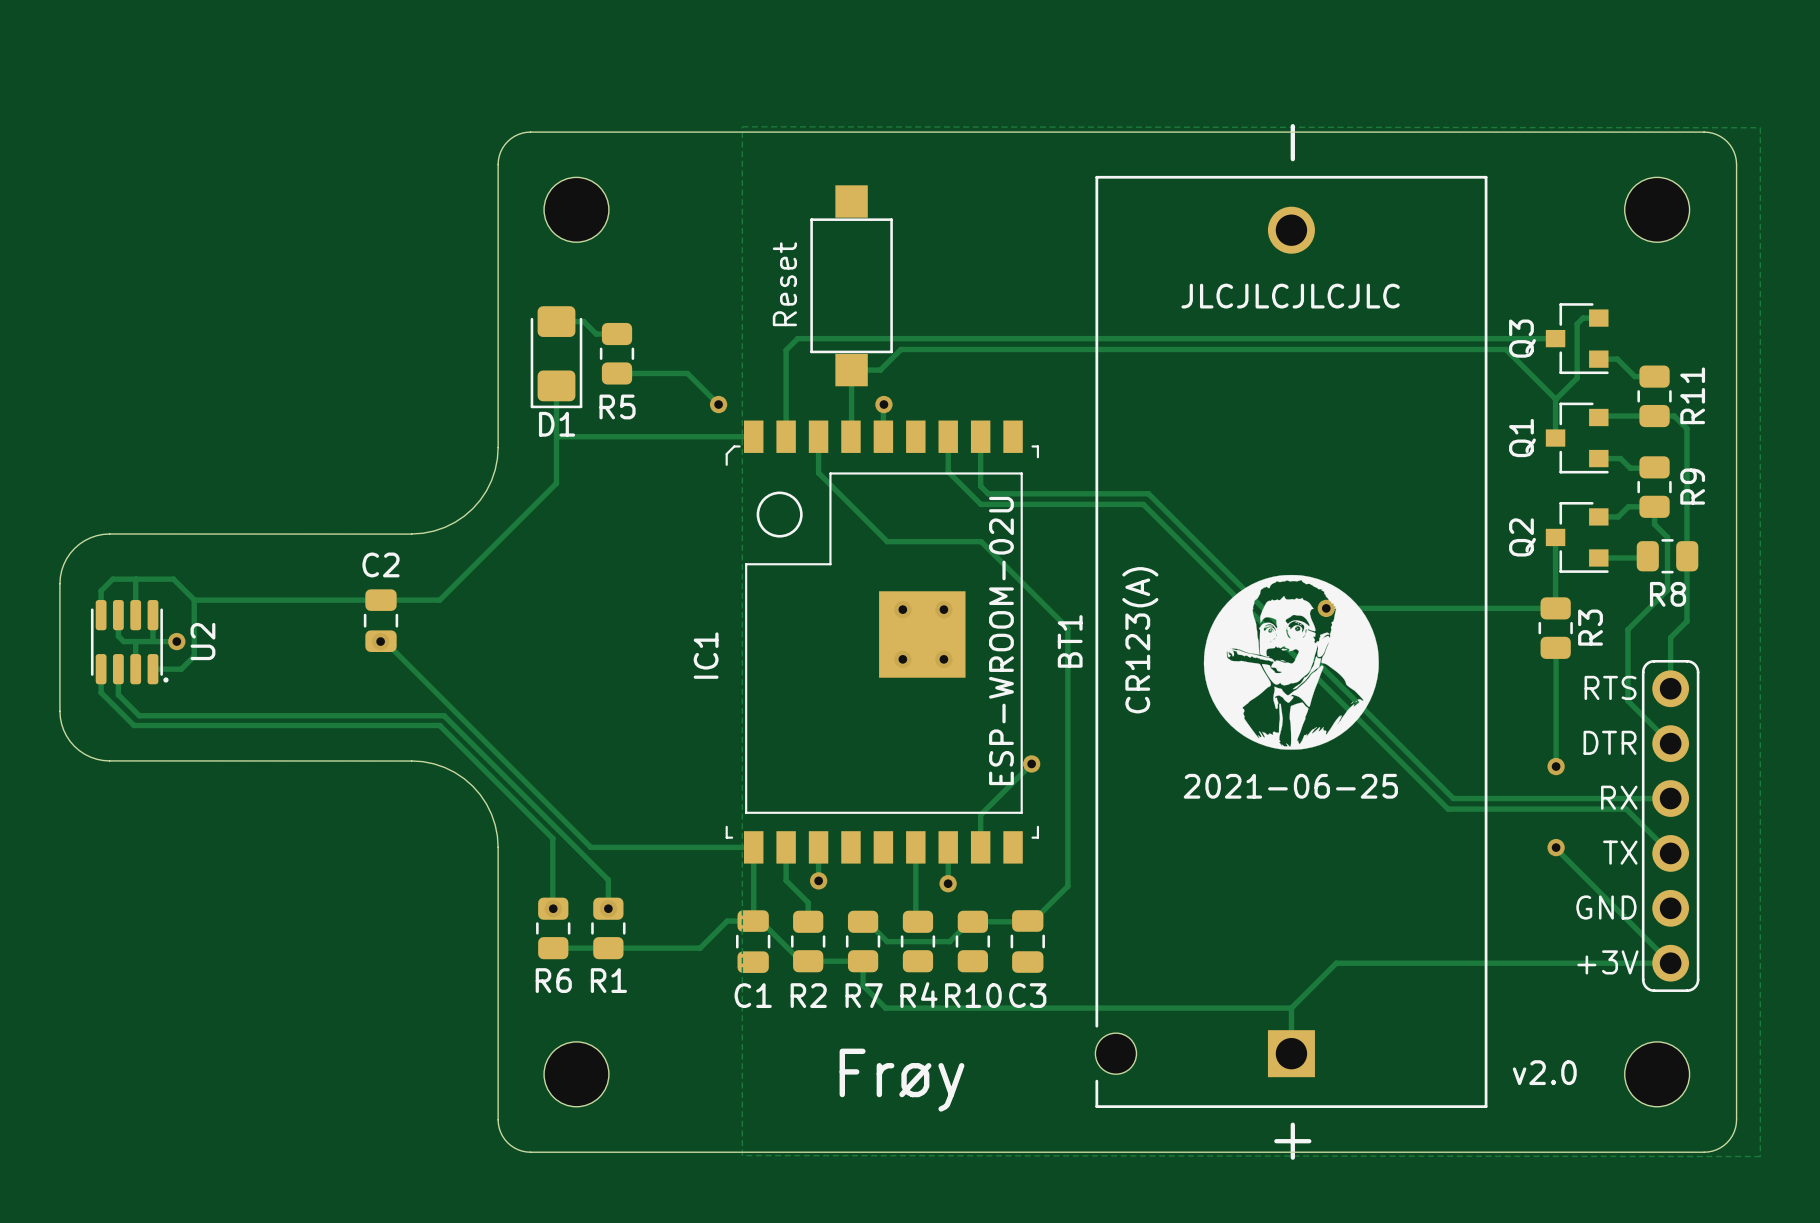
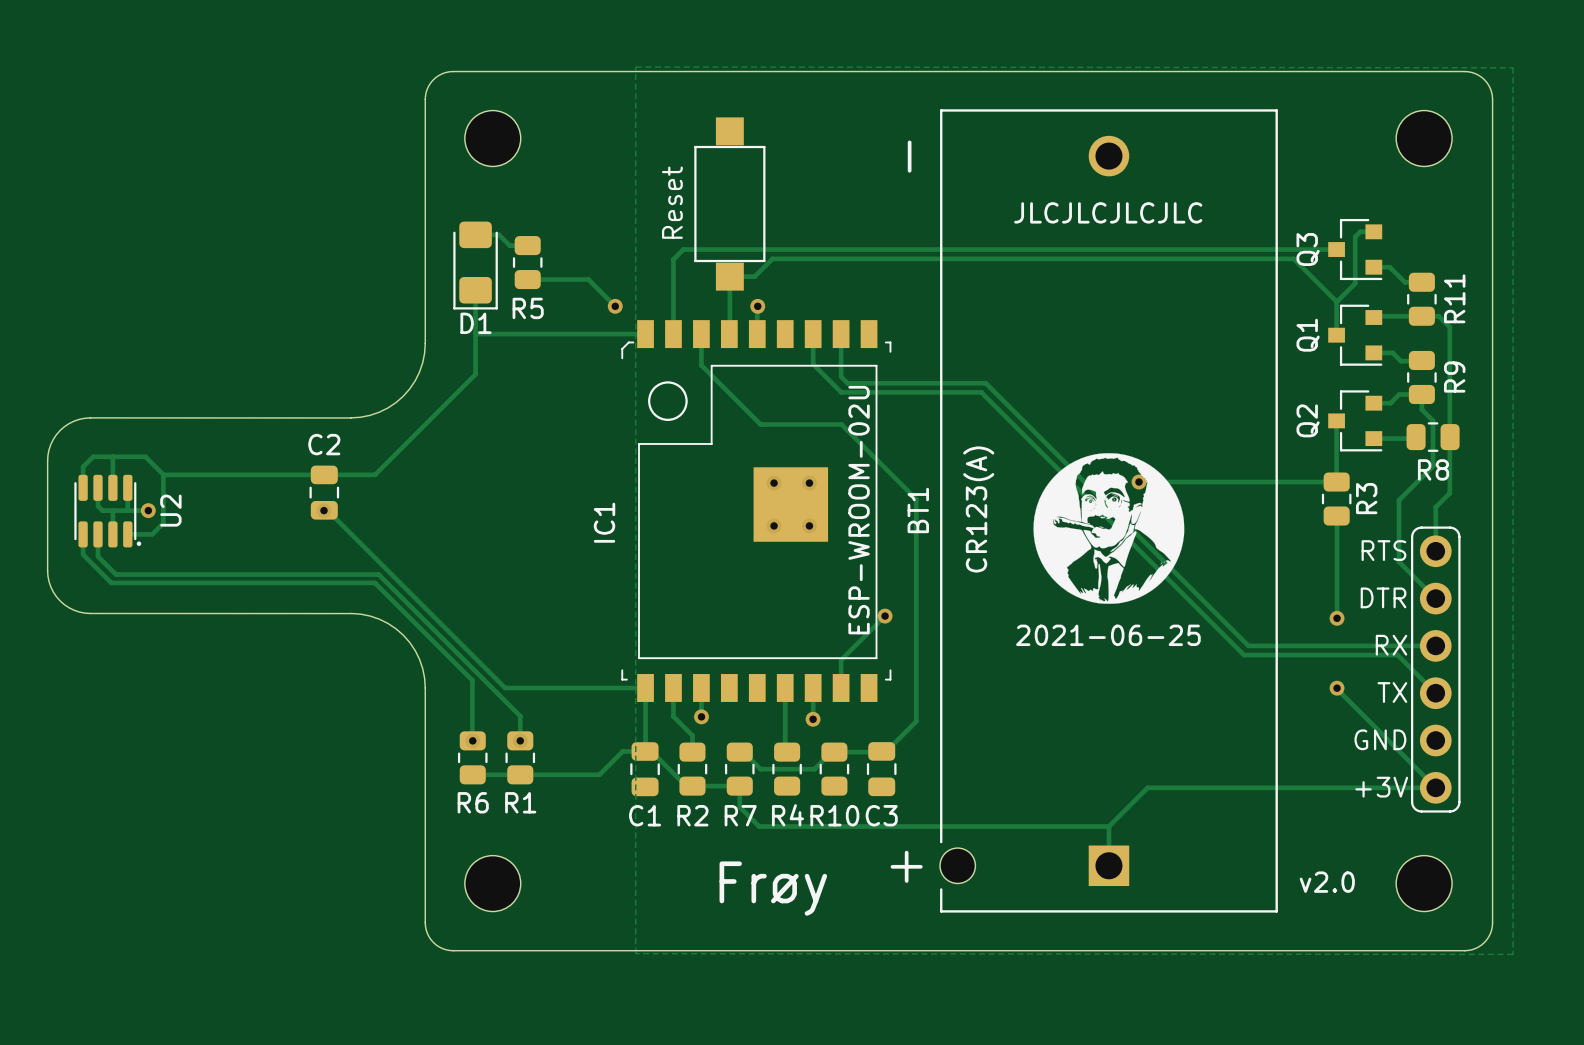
BT1 text position: - (1292, 142) -> - (909, 156)
BT1 text position: + (1292, 1141) -> + (906, 866)

